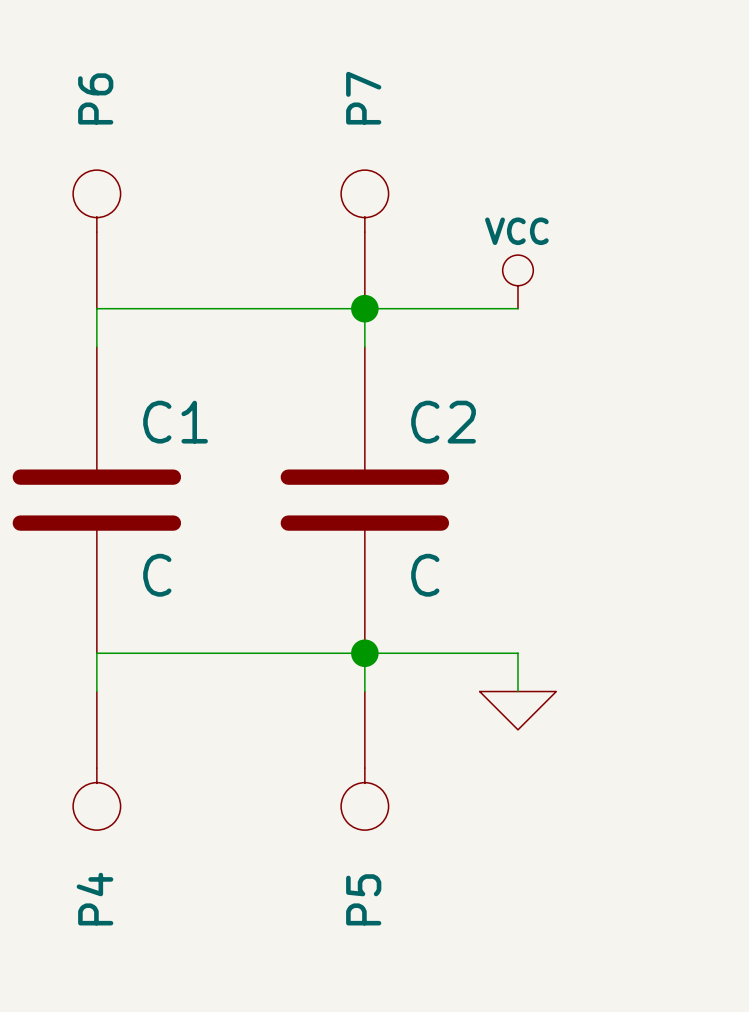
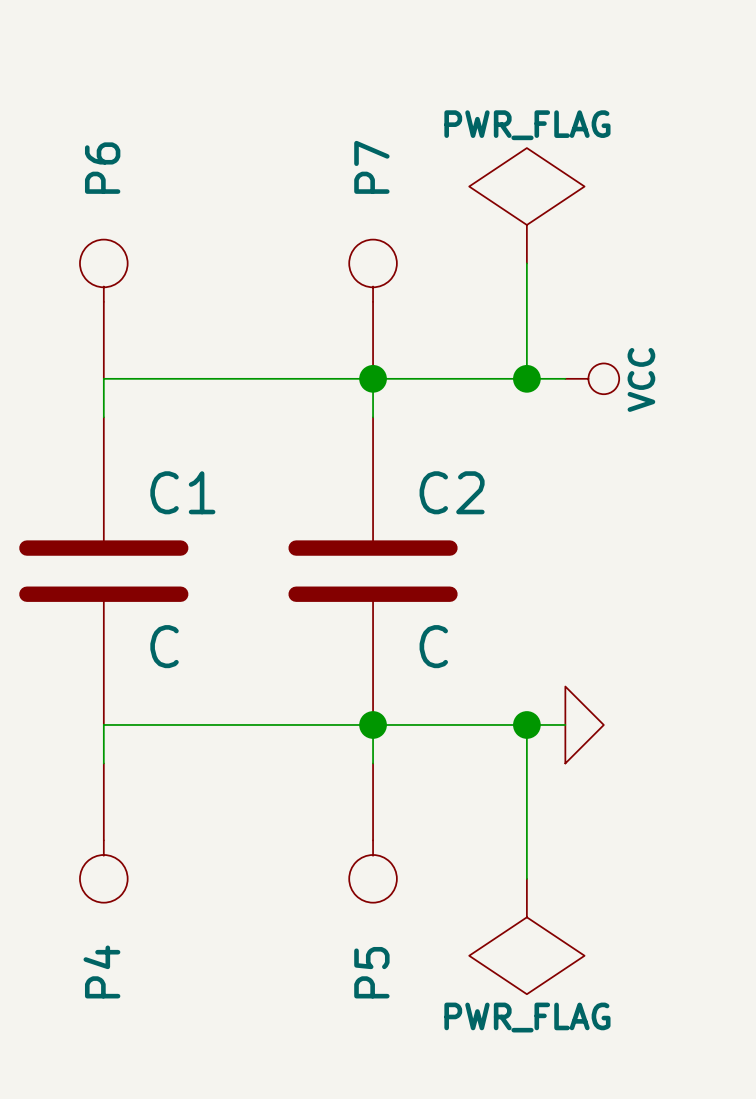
power symbol: none -> PWR_FLAG (526, 205)
wire: none -> (526, 263) (526, 378) (565, 378)
power symbol rotation: 0° (517, 281) -> 90° clockwise (592, 378)
power symbol position: VCC (517, 281) -> VCC (592, 378)
junction: none -> (526, 378)
wire: none -> (526, 724) (565, 724)
junction: none -> (526, 724)
wire: none -> (526, 763) (526, 878)
power symbol rotation: 0° (517, 710) -> 90° counterclockwise (584, 724)
power symbol position: (517, 710) -> (584, 724)
power symbol: none -> PWR_FLAG (526, 936)

